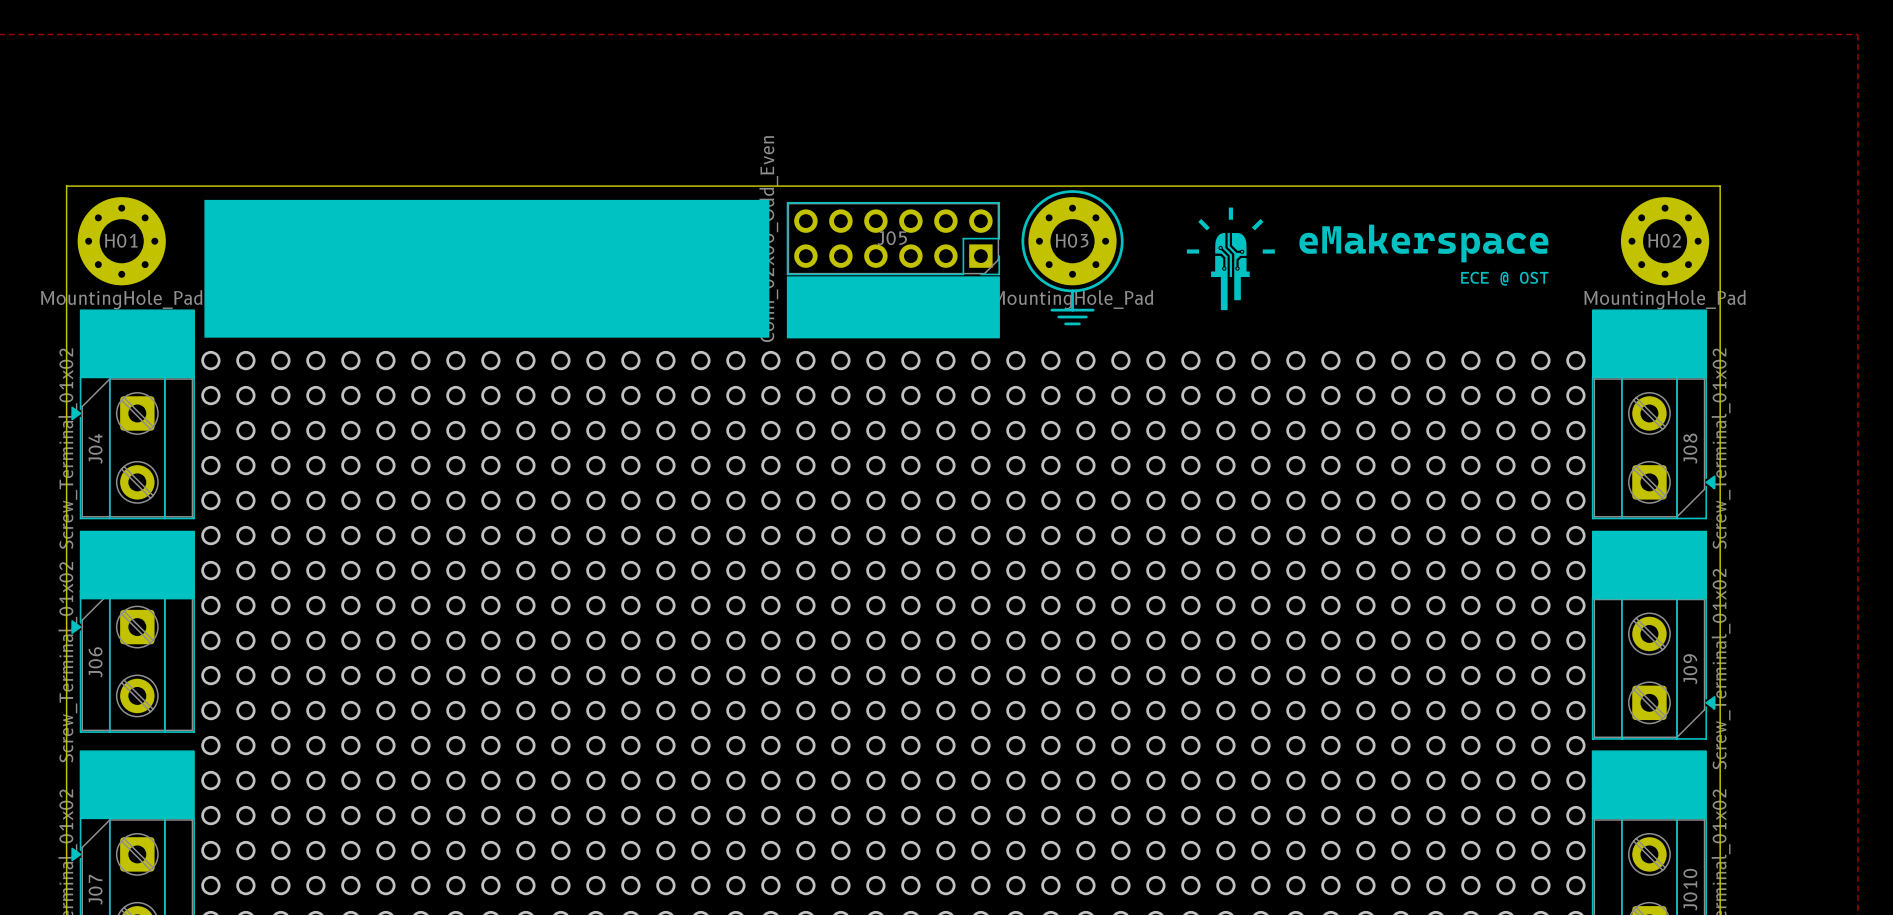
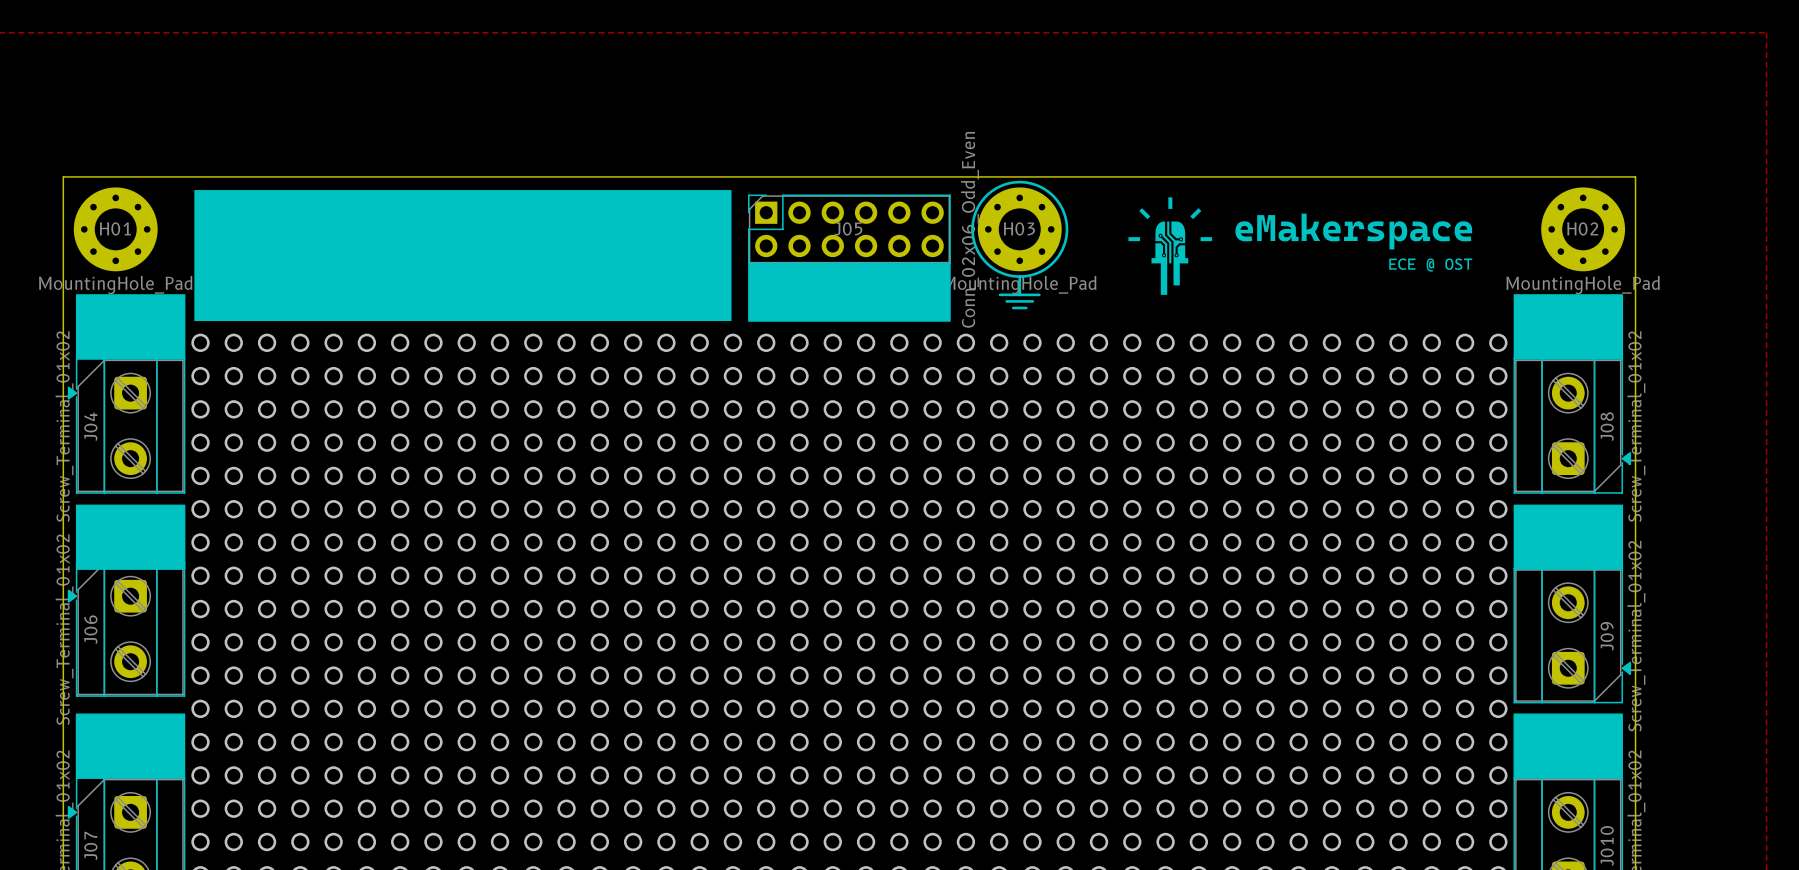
J05 rotation: 0° (893, 238) -> 180° (849, 229)

